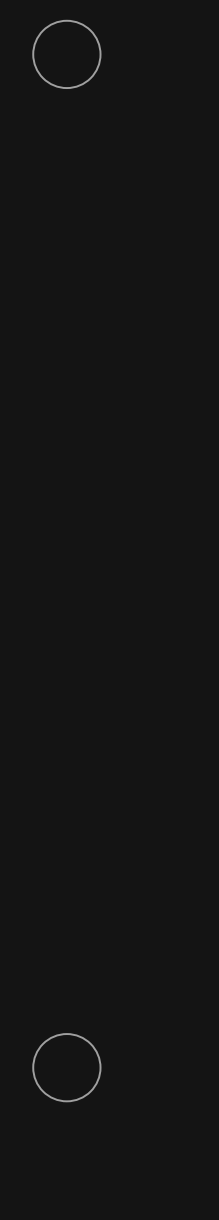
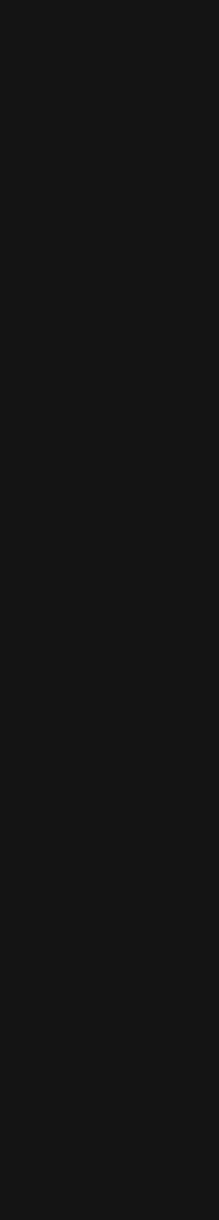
round board edge: [32, 20, 102, 89] -> none
round board edge: [32, 1033, 102, 1102] -> none

